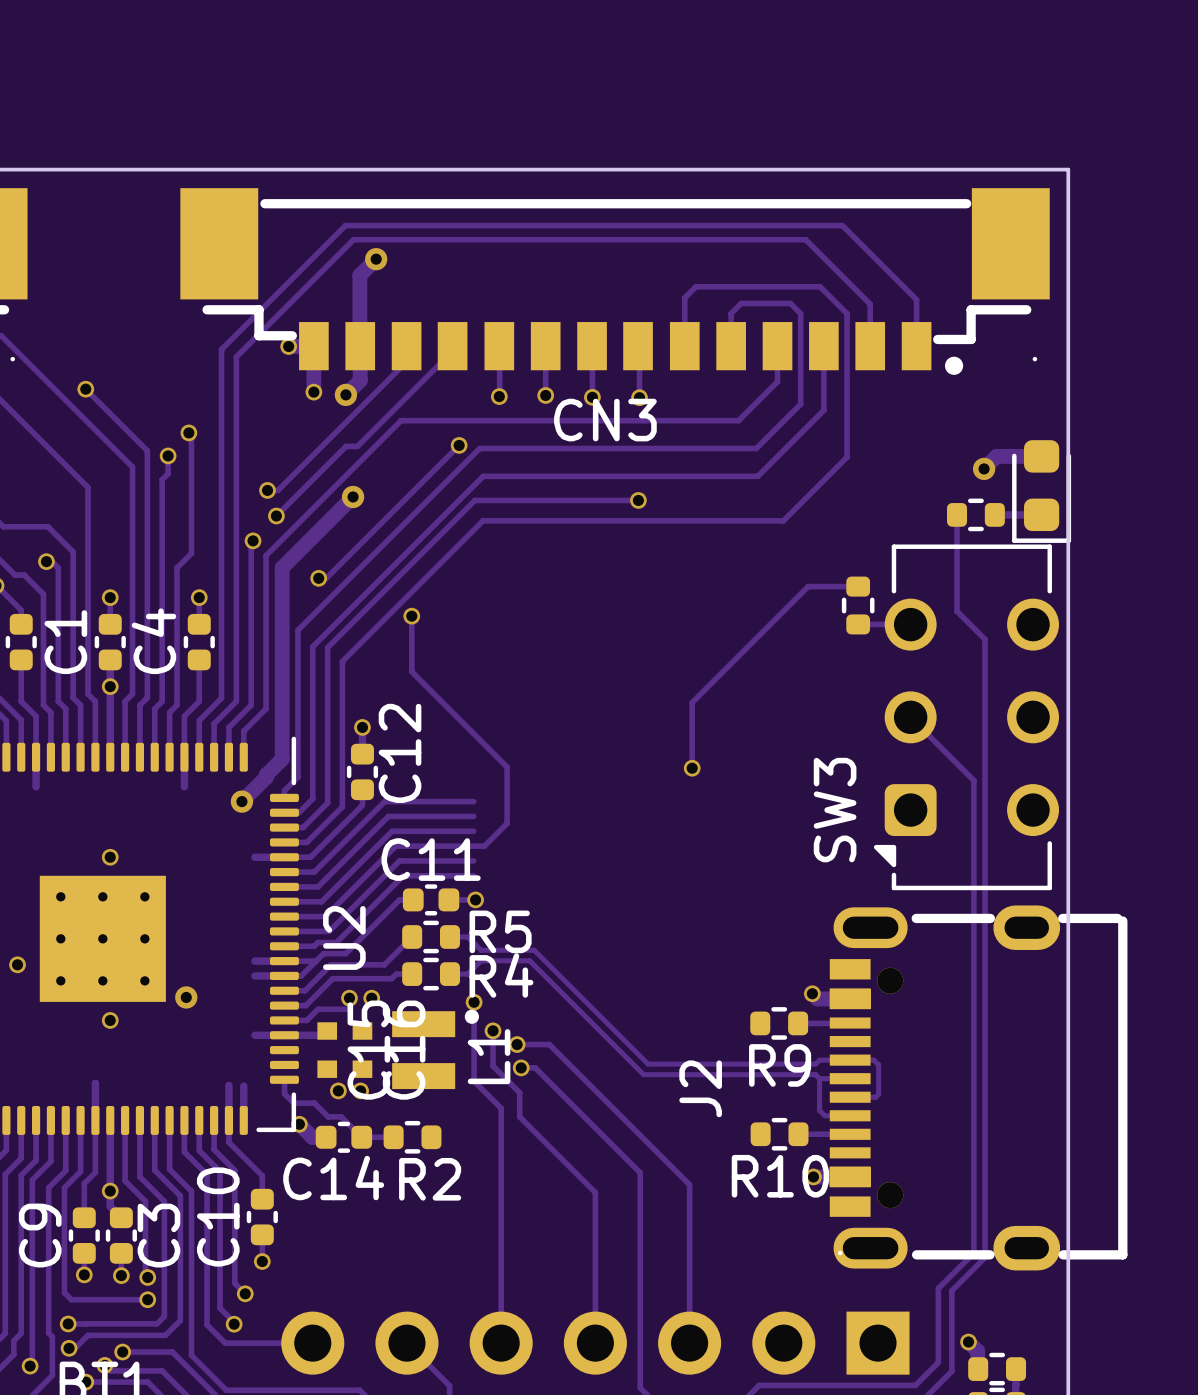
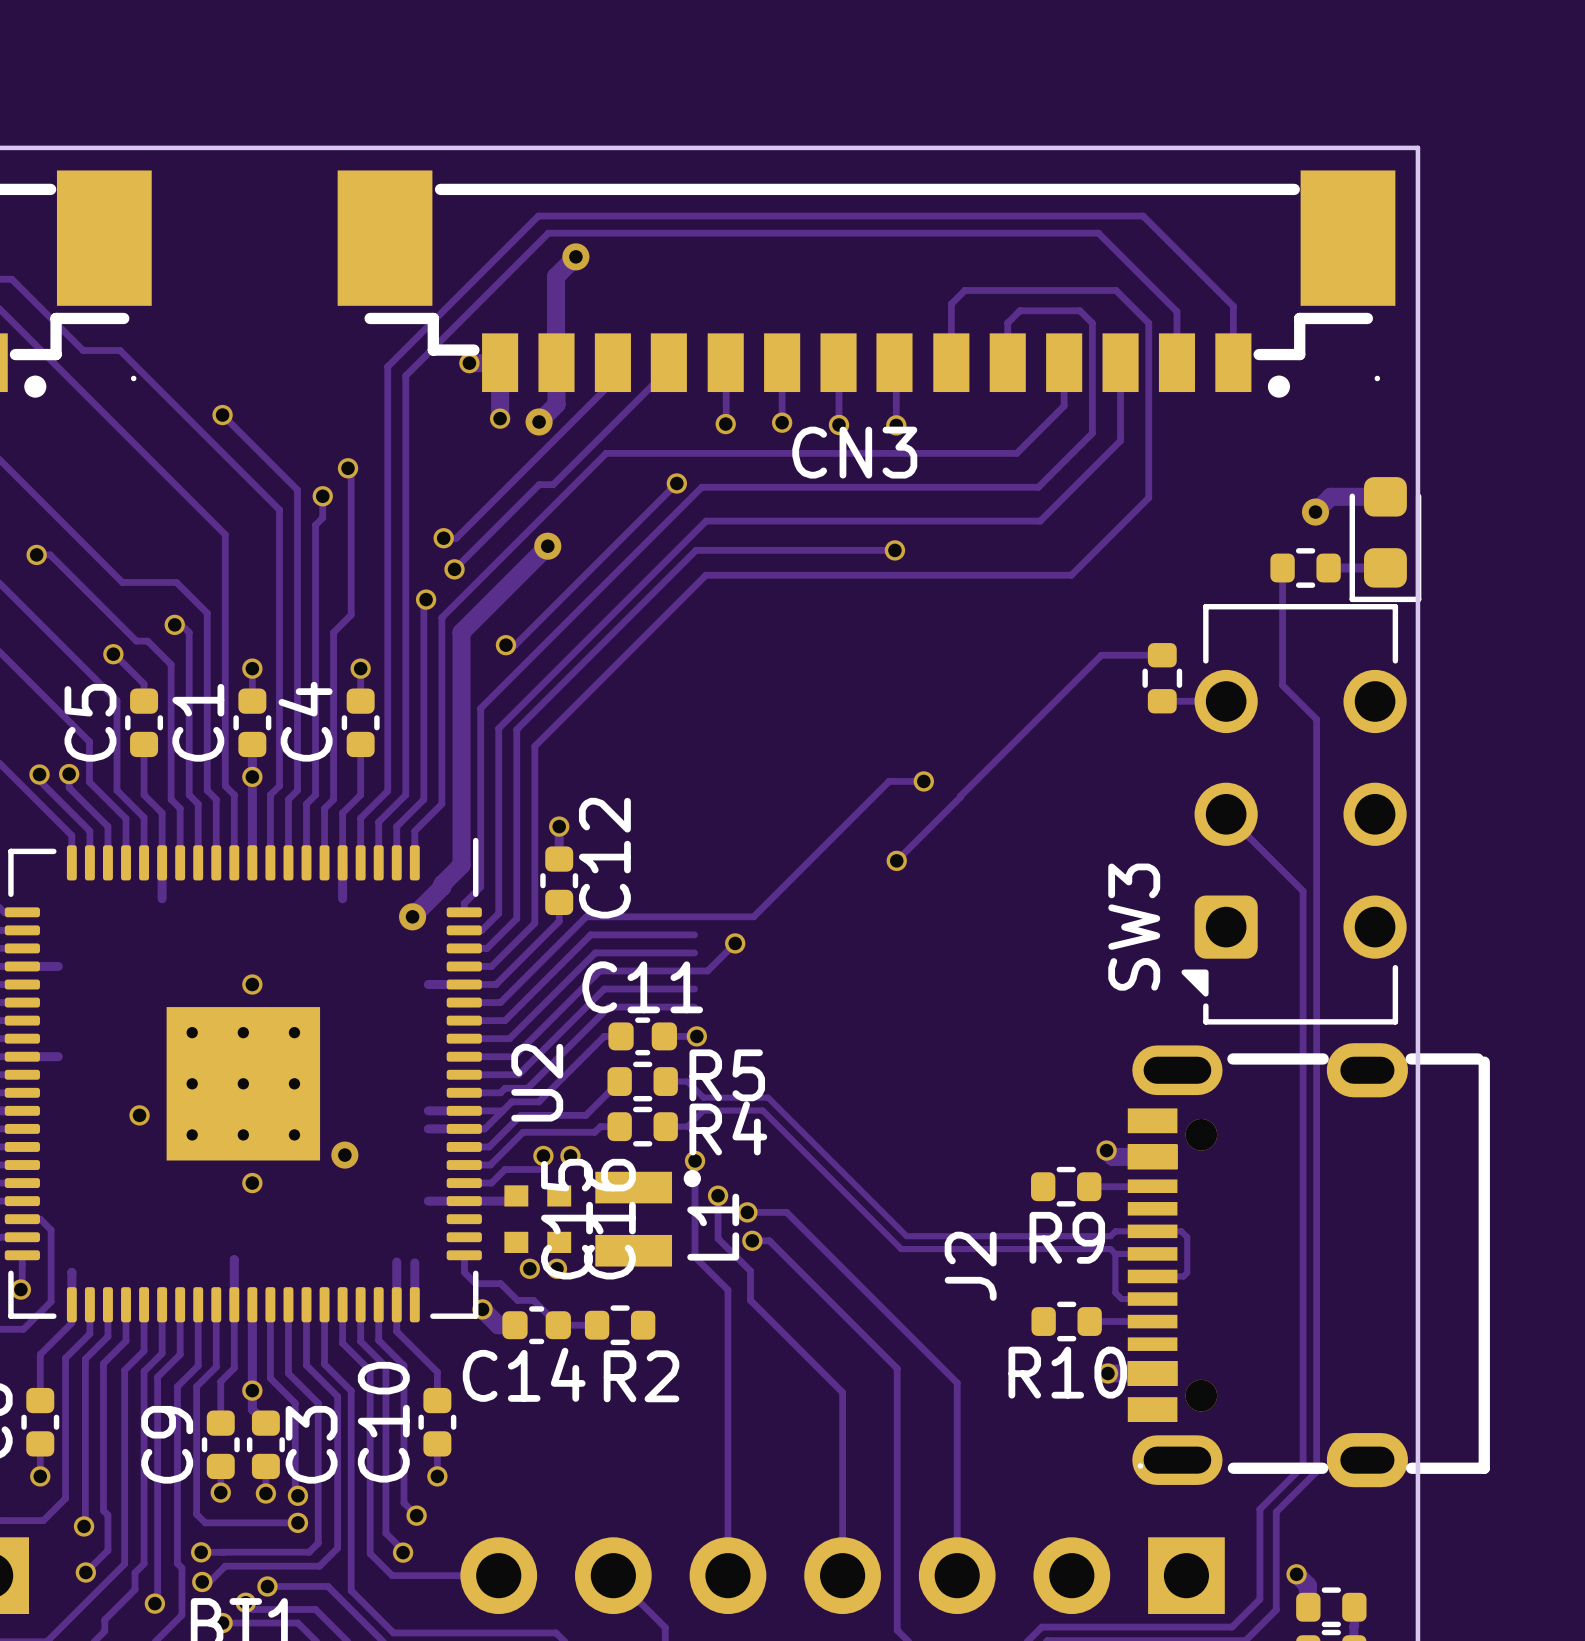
track: (411, 616) (411, 671) (507, 767) (507, 823) -> none
via: (411, 616) -> none
track: none -> (923, 781) (889, 781) (753, 916) (694, 916)
via: none -> (923, 781)
track: (692, 703) (692, 768) -> (960, 797) (896, 860)
via: none -> (896, 860)
via: (692, 768) -> none
via: none -> (735, 943)

